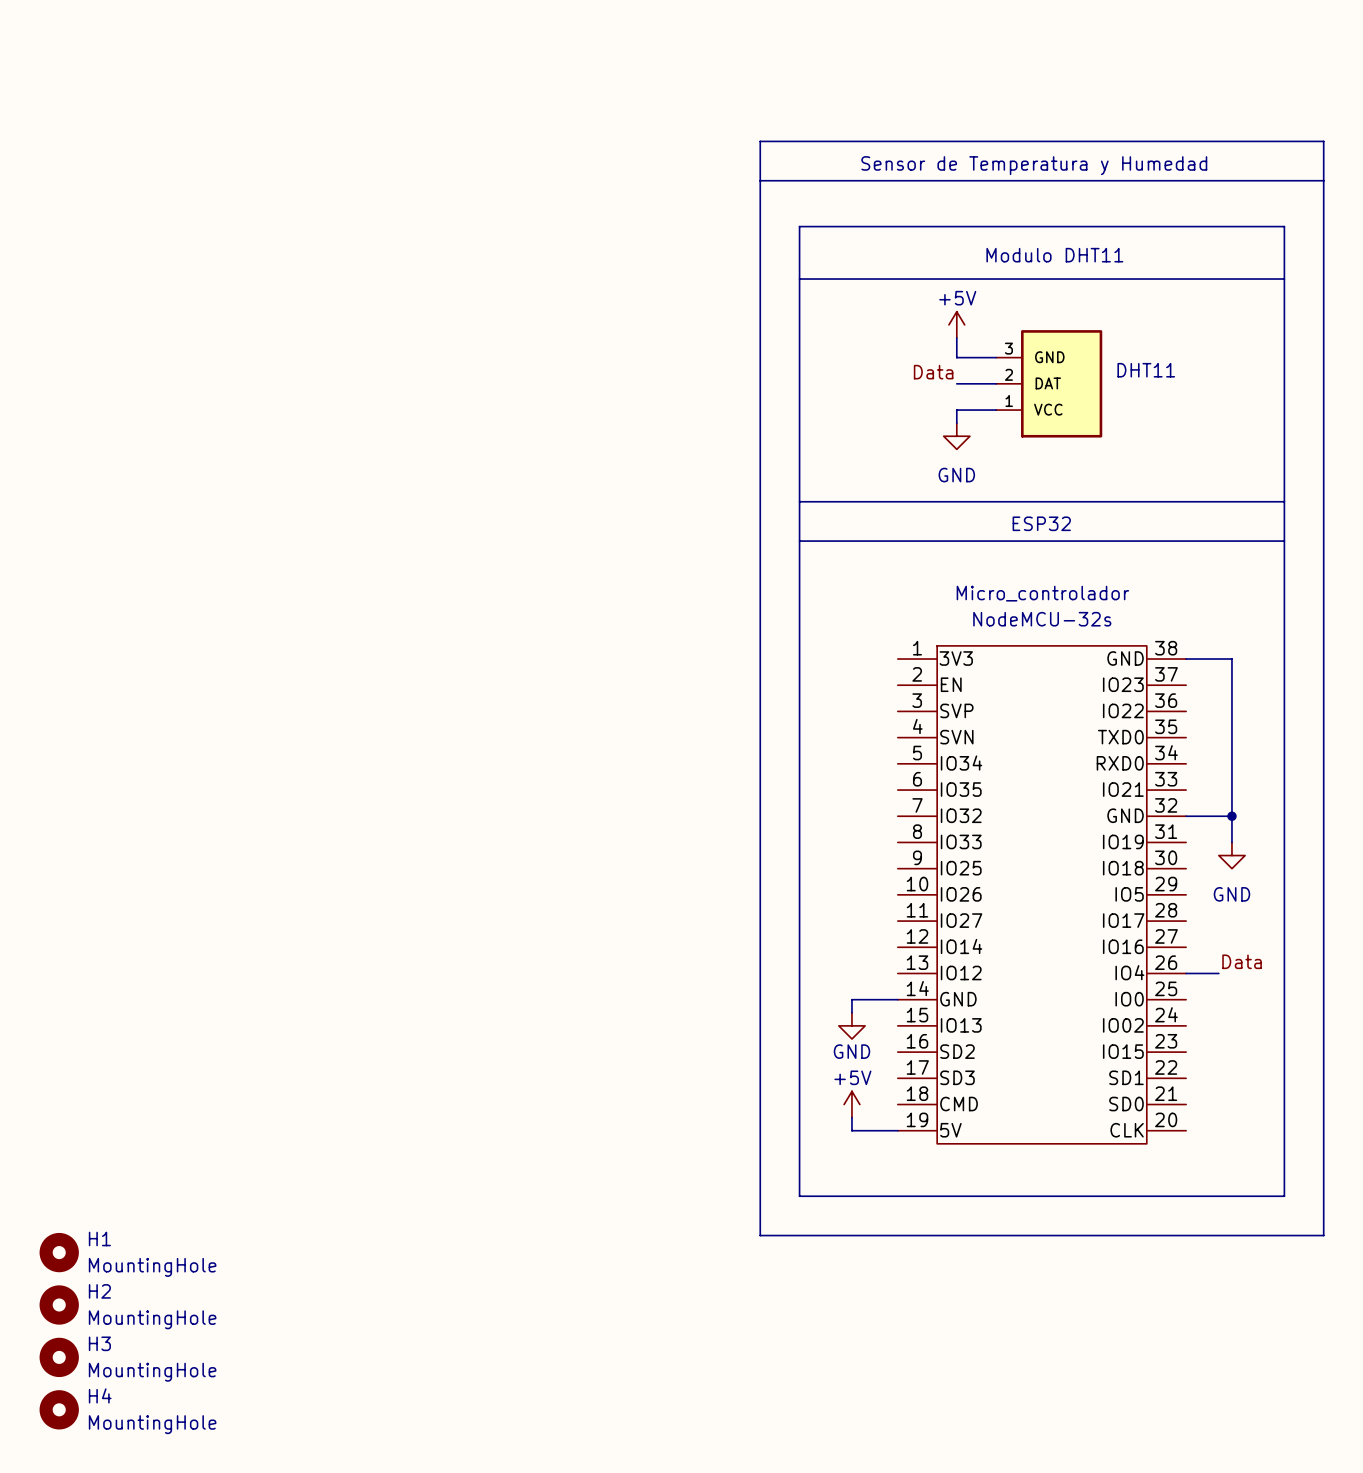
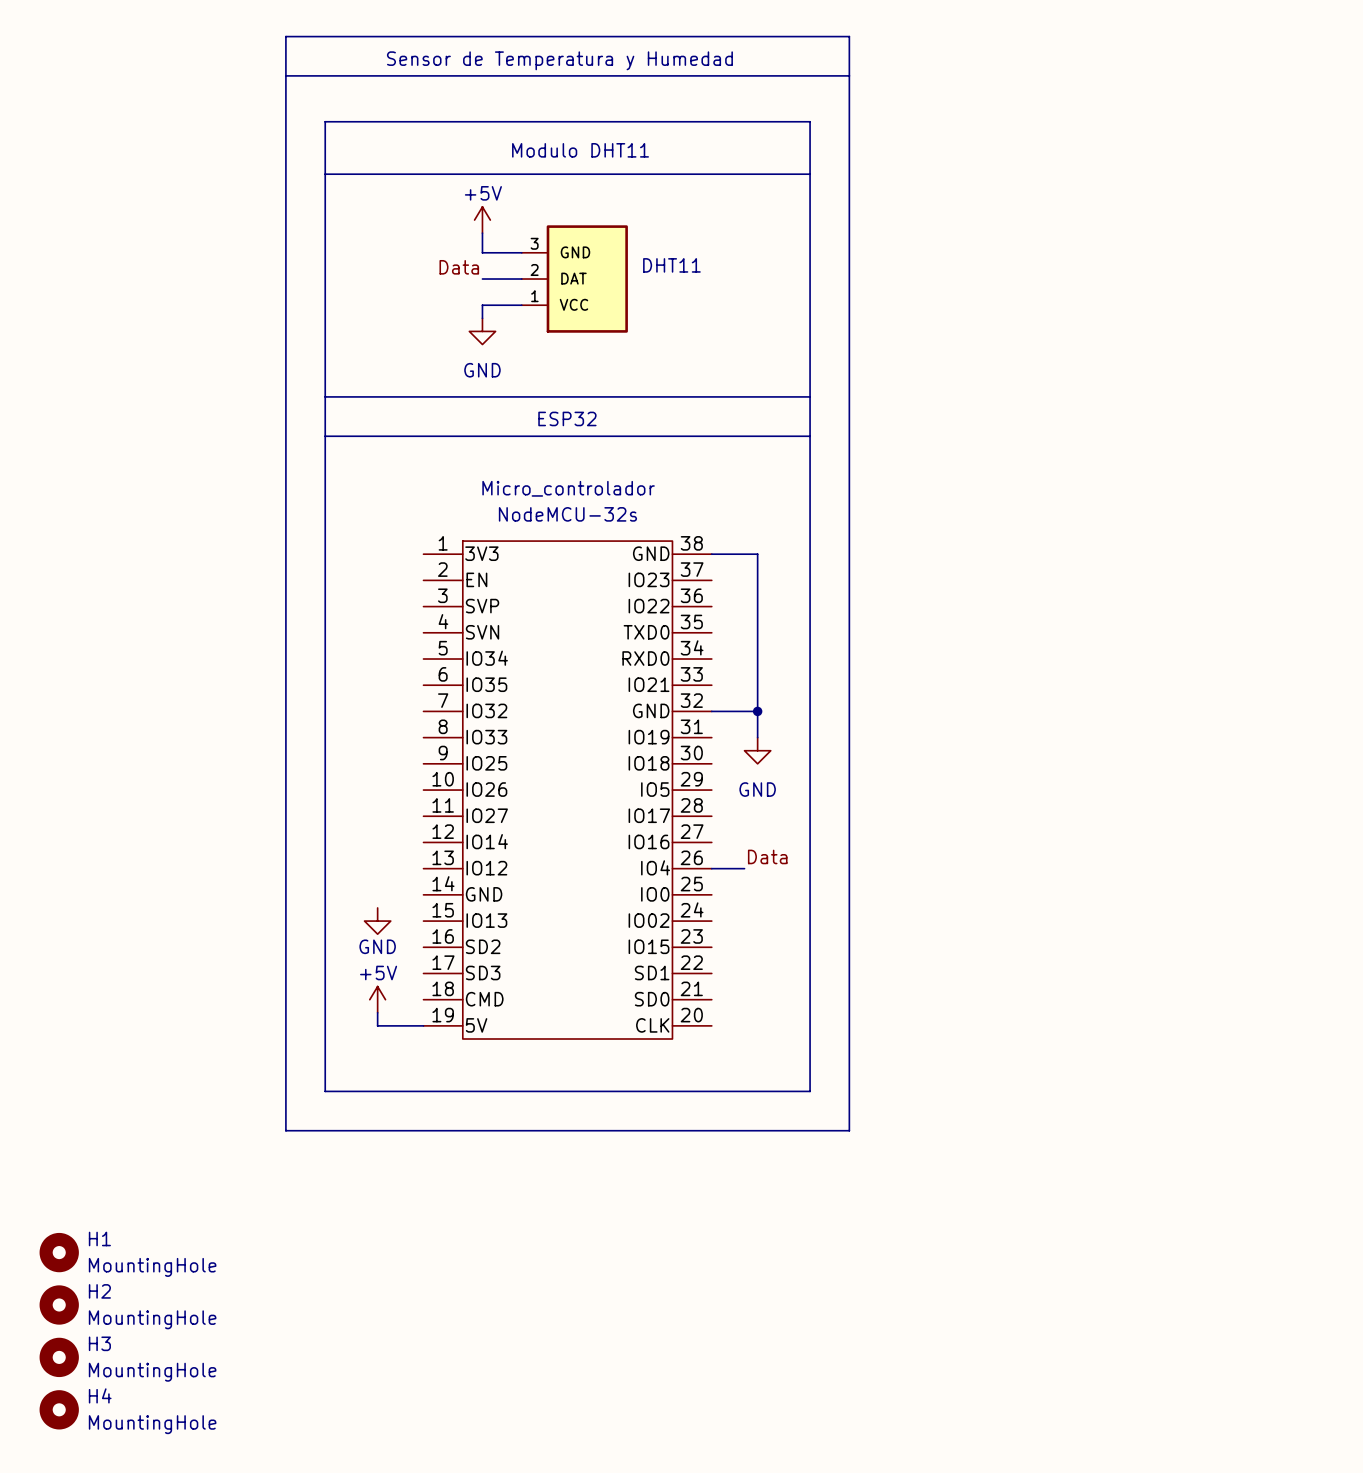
line: none -> (285, 36) (849, 36) (849, 1130) (285, 1130) (285, 36)
text: none -> Sensor de Temperatura y Humedad (559, 60)
line: none -> (285, 75) (849, 75)
line: none -> (325, 121) (325, 1091) (810, 1091) (810, 121) (325, 121)
line: (760, 141) (1323, 141) (1323, 1235) (760, 1235) (760, 141) -> none
text: none -> Modulo DHT11 (580, 150)
text: Sensor de Temperatura y Humedad (1034, 165) -> none
line: none -> (325, 174) (810, 174)
line: (760, 180) (1323, 180) -> none
power symbol: none -> +5V (482, 220)
line: (799, 226) (799, 1196) (1284, 1196) (1284, 226) (799, 226) -> none
wire: none -> (482, 233) (482, 252) (521, 252)
text: Modulo DHT11 (1054, 255) -> none
label: none -> Data (459, 267)
wire: none -> (482, 279) (521, 279)
part: none -> DHT11 (574, 279)
line: (799, 279) (1284, 279) -> none
wire: none -> (521, 305) (482, 305) (482, 318)
power symbol: +5V (956, 324) -> none
power symbol: none -> GND (482, 331)
wire: (956, 337) (956, 357) (996, 357) -> none
label: Data (933, 372) -> none
wire: (956, 383) (996, 383) -> none
part: DHT11 (1049, 383) -> none
line: none -> (325, 396) (810, 396)
wire: (996, 410) (956, 410) (956, 423) -> none
text: none -> ESP32 (567, 418)
line: none -> (325, 436) (810, 436)
power symbol: GND (956, 436) -> none
line: (799, 501) (1284, 501) -> none
text: ESP32 (1041, 523) -> none
line: (799, 541) (1284, 541) -> none
wire: none -> (711, 554) (757, 554) (757, 737)
wire: (1186, 659) (1231, 659) (1231, 842) -> none
wire: none -> (711, 711) (757, 711)
junction: none -> (757, 711)
power symbol: none -> GND (757, 750)
Micro_controlador: none -> NodeMCU-32s (567, 790)
wire: (1186, 816) (1231, 816) -> none
junction: (1231, 816) -> none
power symbol: GND (1231, 855) -> none
label: none -> Data (767, 856)
wire: none -> (711, 868) (744, 868)
Micro_controlador: NodeMCU-32s (1041, 894) -> none
power symbol: none -> GND (377, 921)
label: Data (1242, 961) -> none
wire: (1186, 973) (1218, 973) -> none
power symbol: none -> +5V (377, 999)
wire: (897, 999) (851, 999) (851, 1012) -> none
wire: none -> (377, 1012) (377, 1025) (423, 1025)
power symbol: GND (851, 1025) -> none
power symbol: +5V (851, 1104) -> none
wire: (851, 1117) (851, 1130) (897, 1130) -> none

